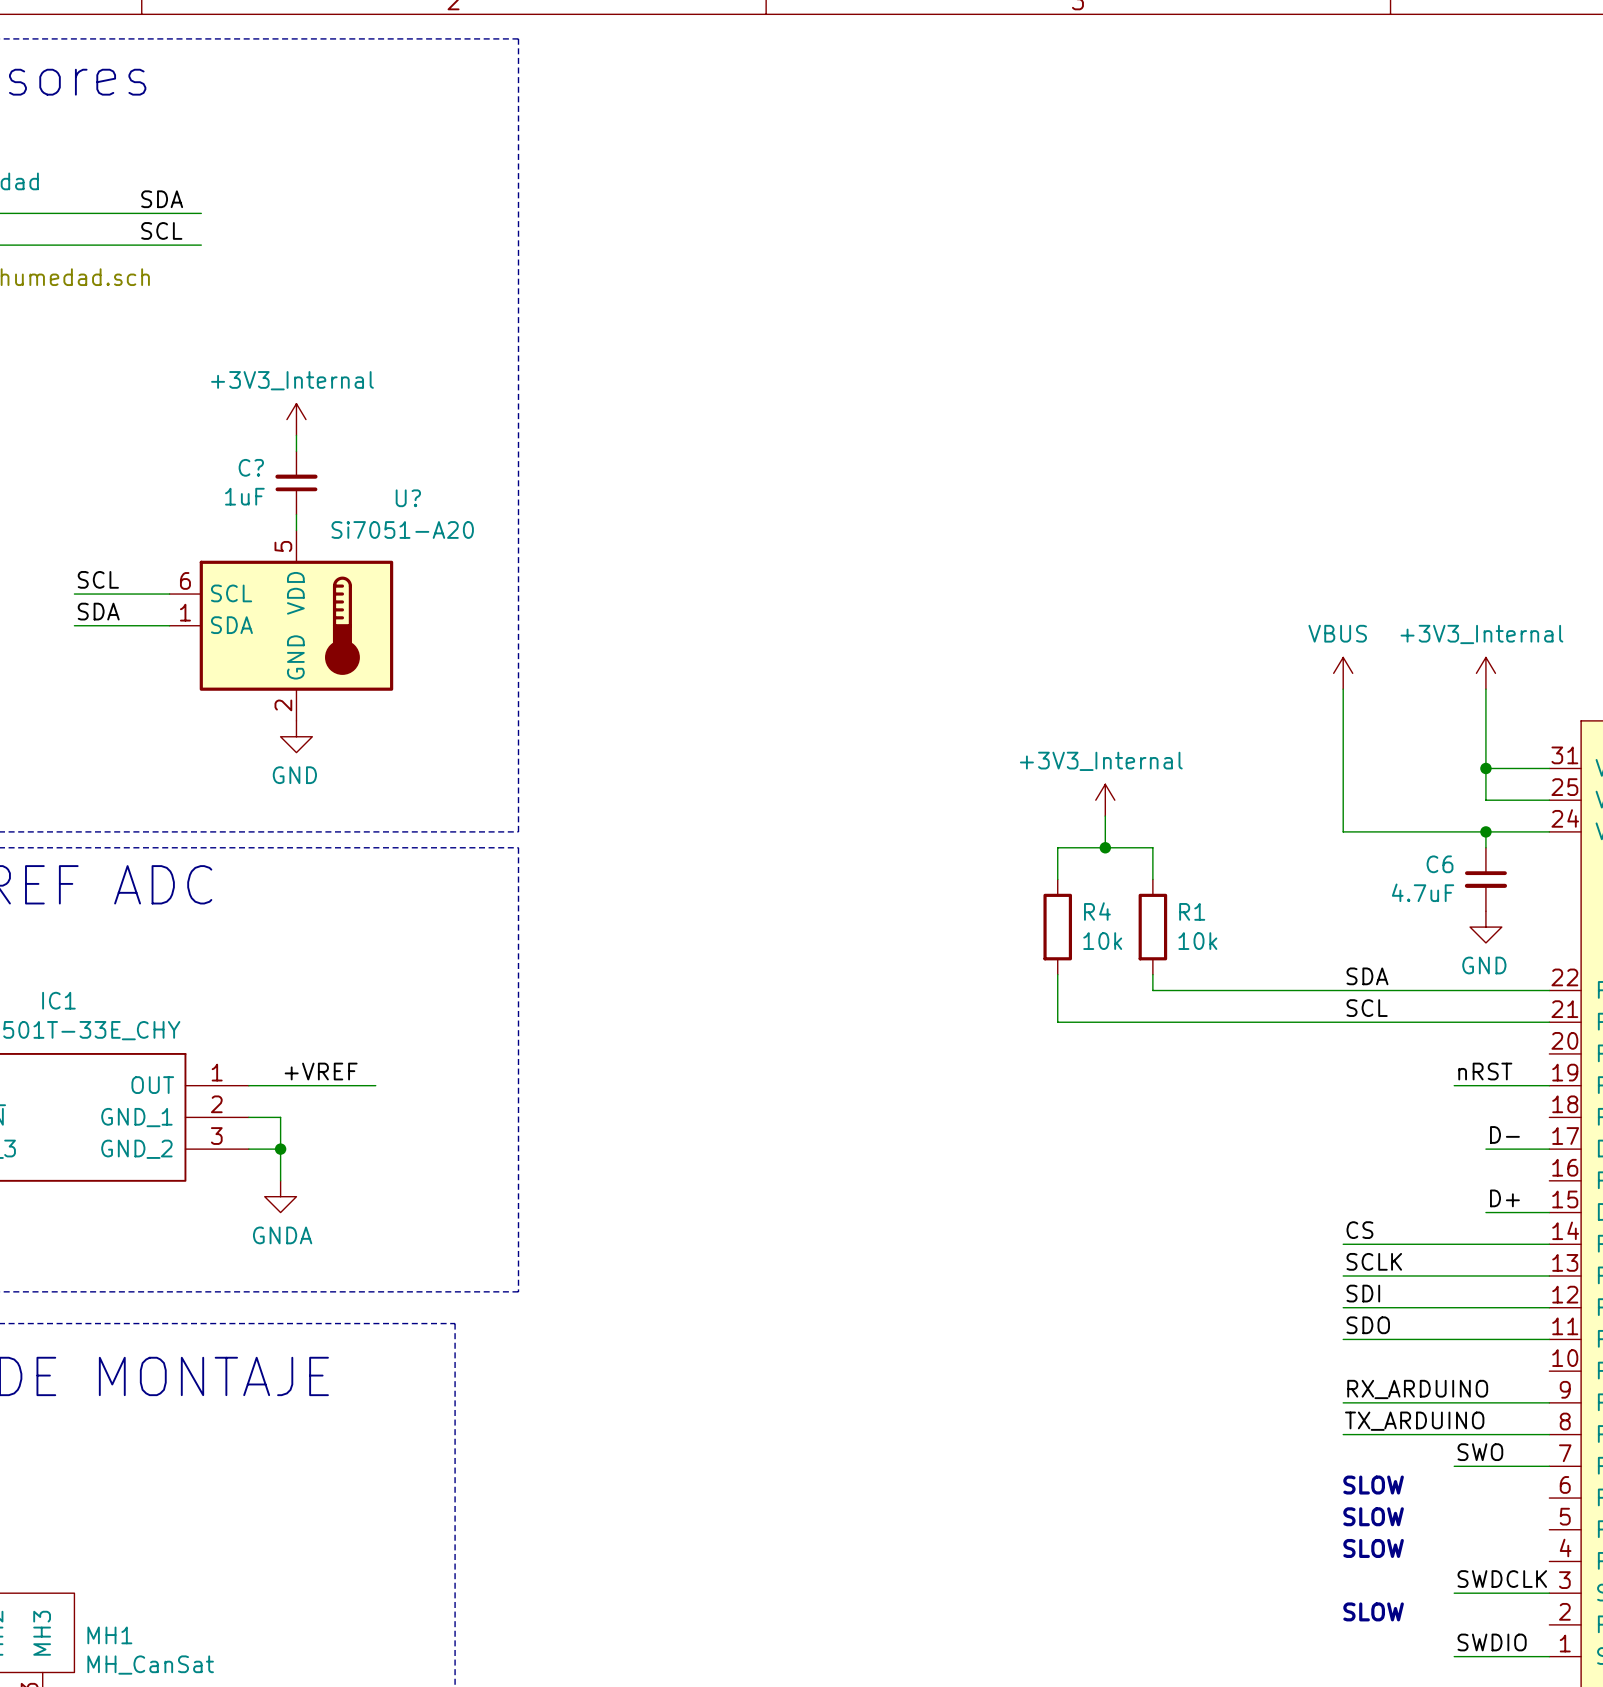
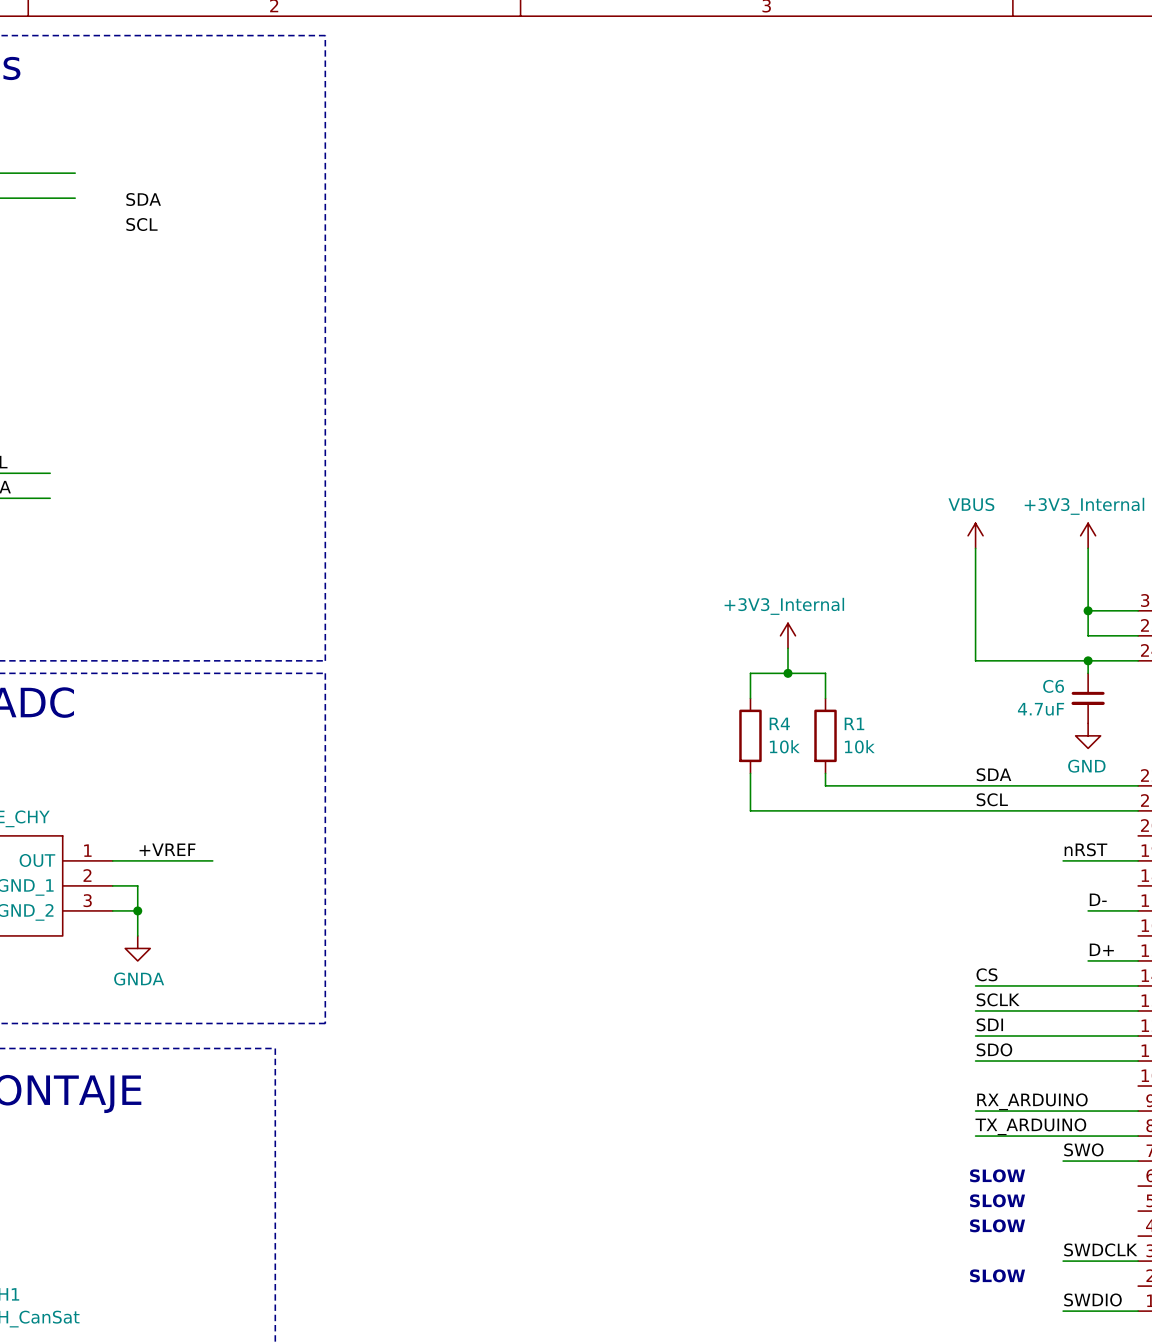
label position: SDA (162, 199) -> SDA (143, 199)
label position: SCL (161, 230) -> SCL (141, 224)
power symbol: +3V3_Internal (296, 419) -> none
wire: (296, 435) (296, 451) -> none
C?: 1uF (296, 483) -> none
wire: (296, 514) (296, 530) -> none
U?: Si7051-A20 (281, 625) -> none
power symbol: GND (296, 736) -> none

